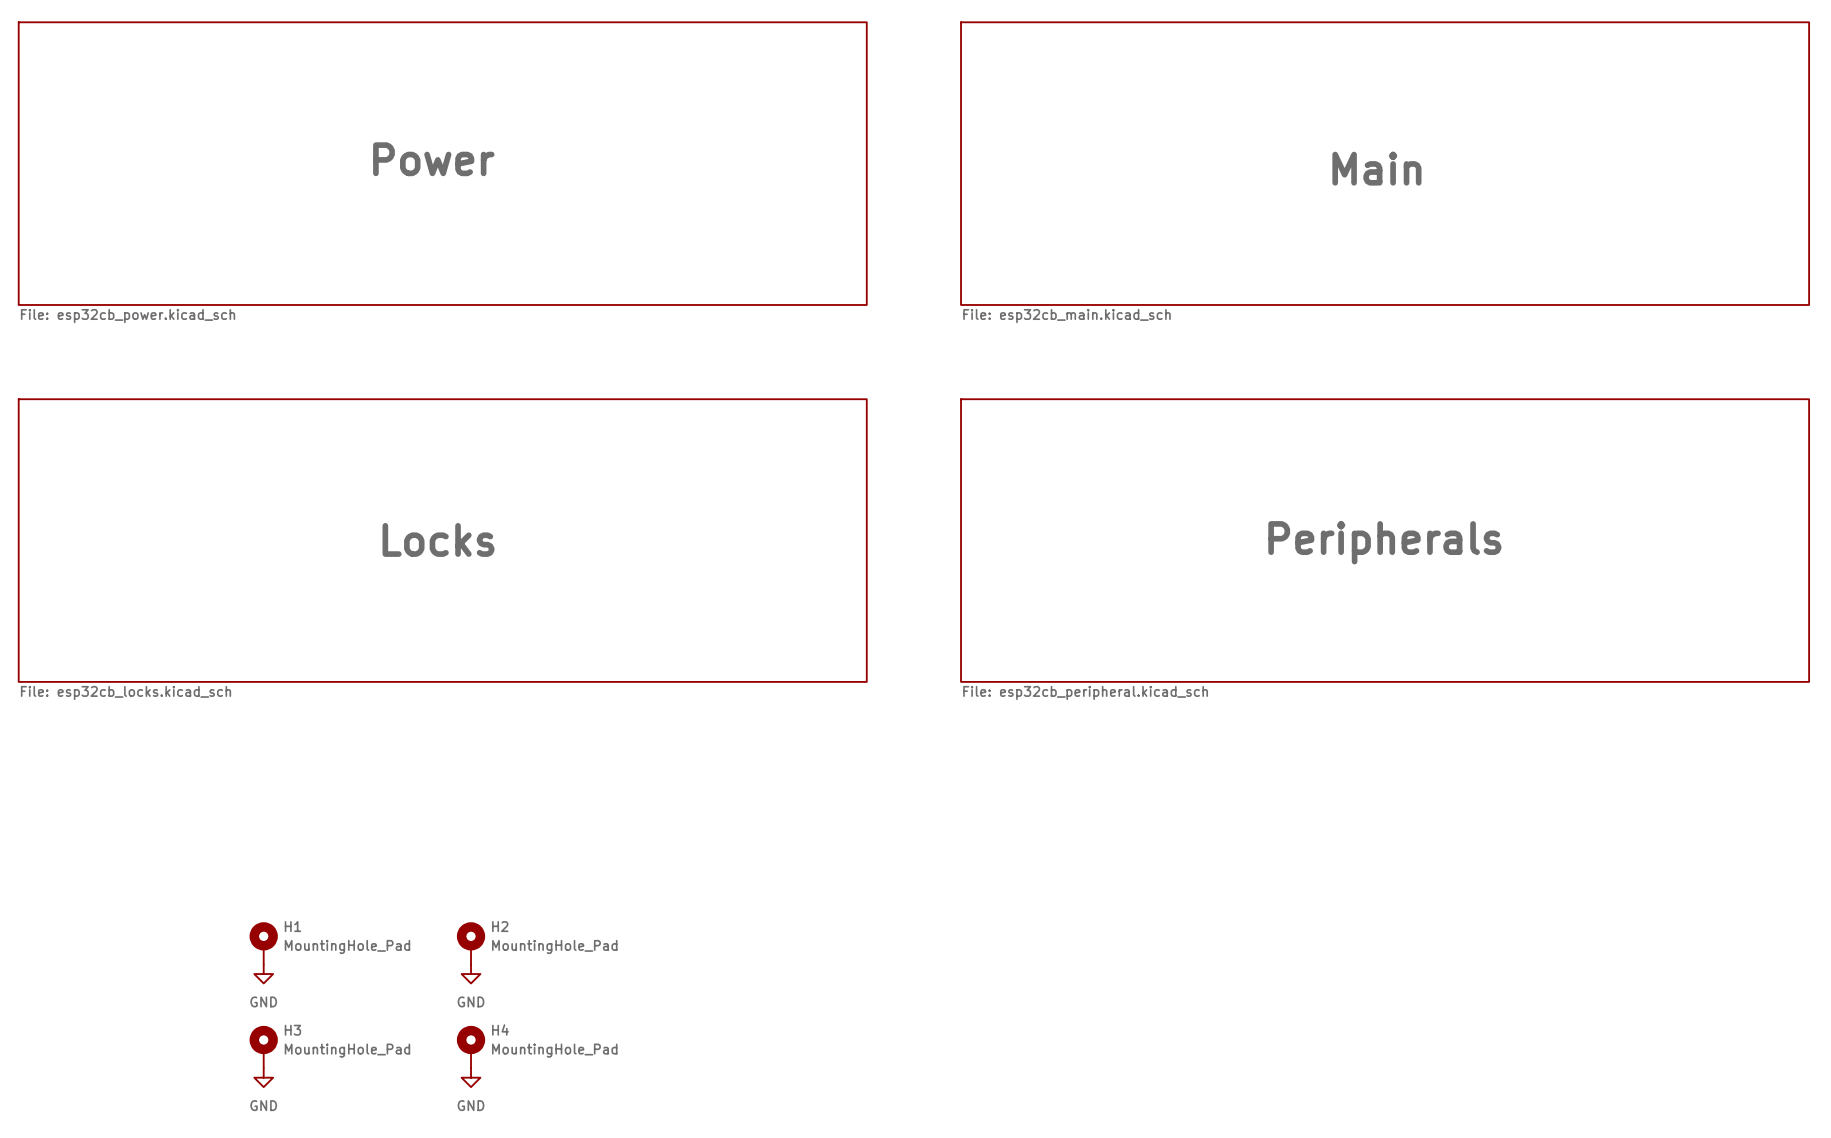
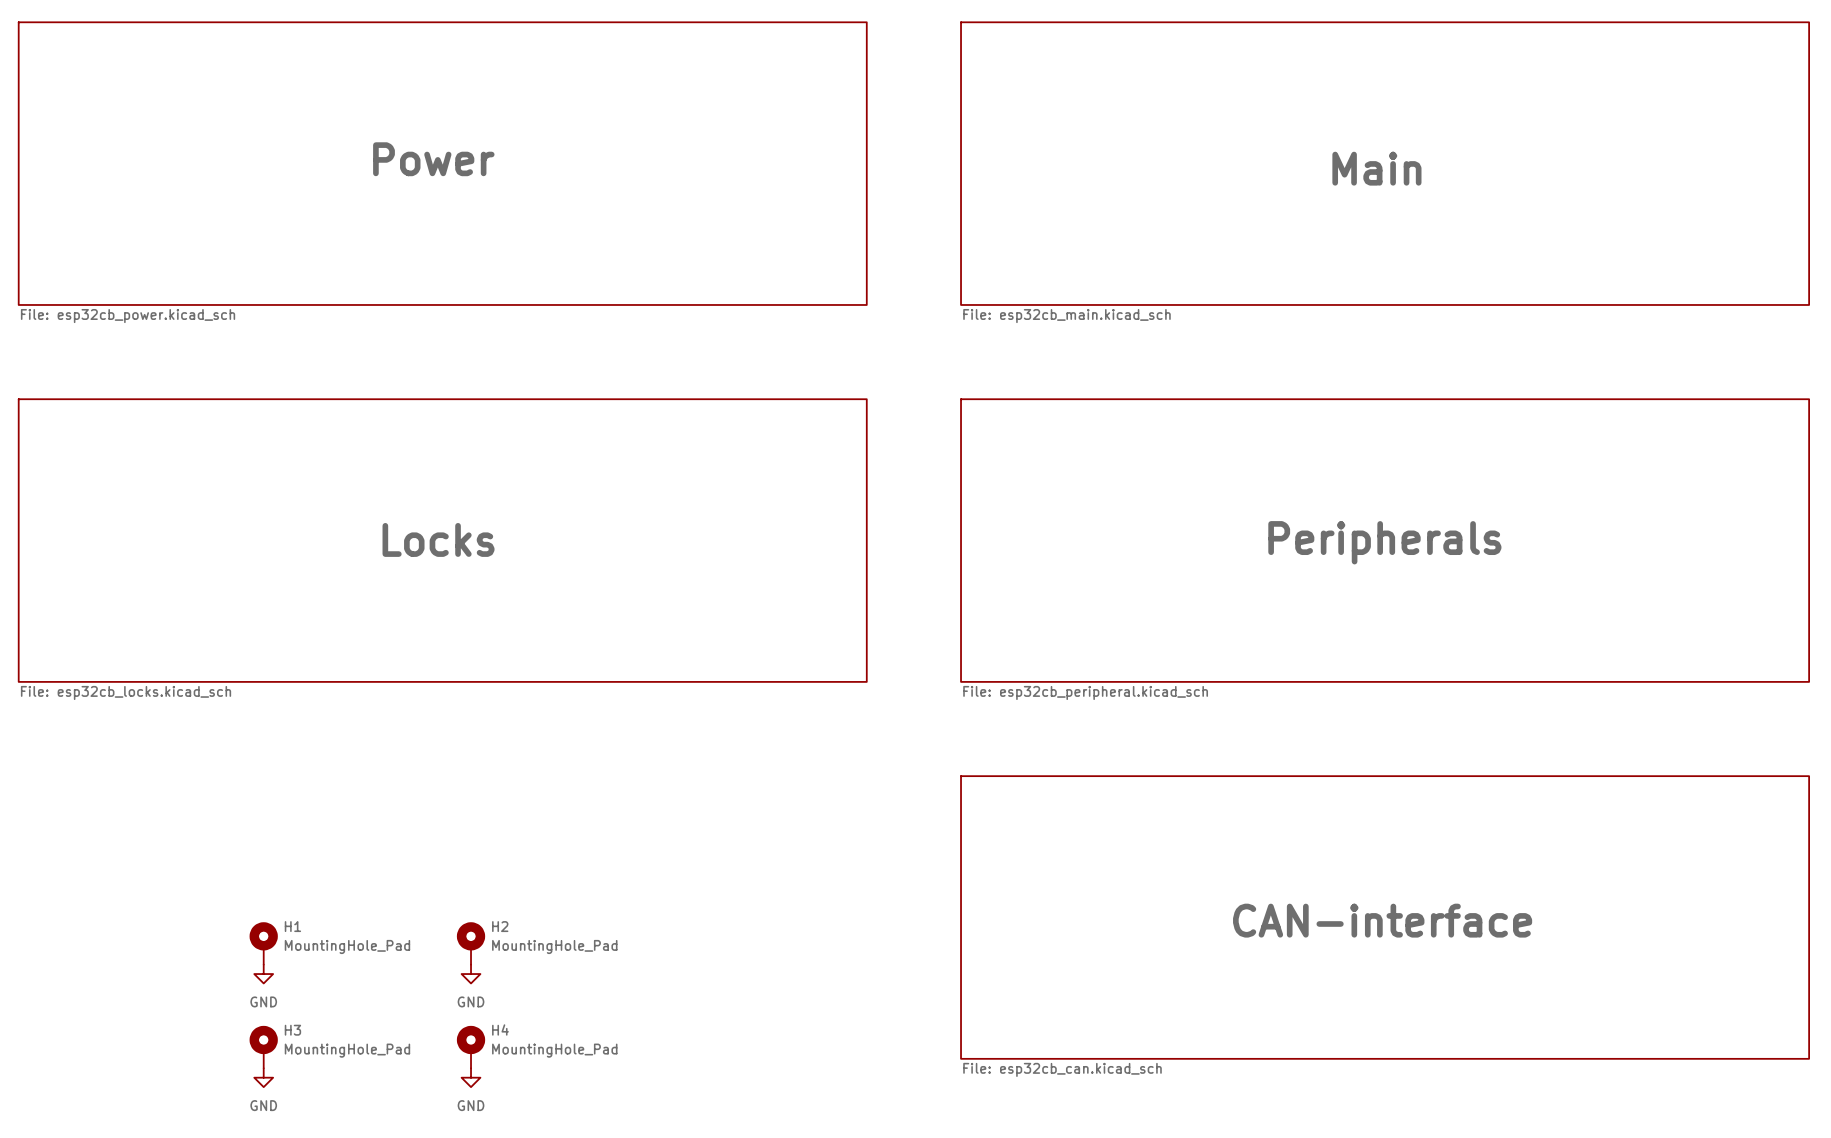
sheet CAN-interface: none -> File: esp32cb_can.kicad_sch (1385, 917)

